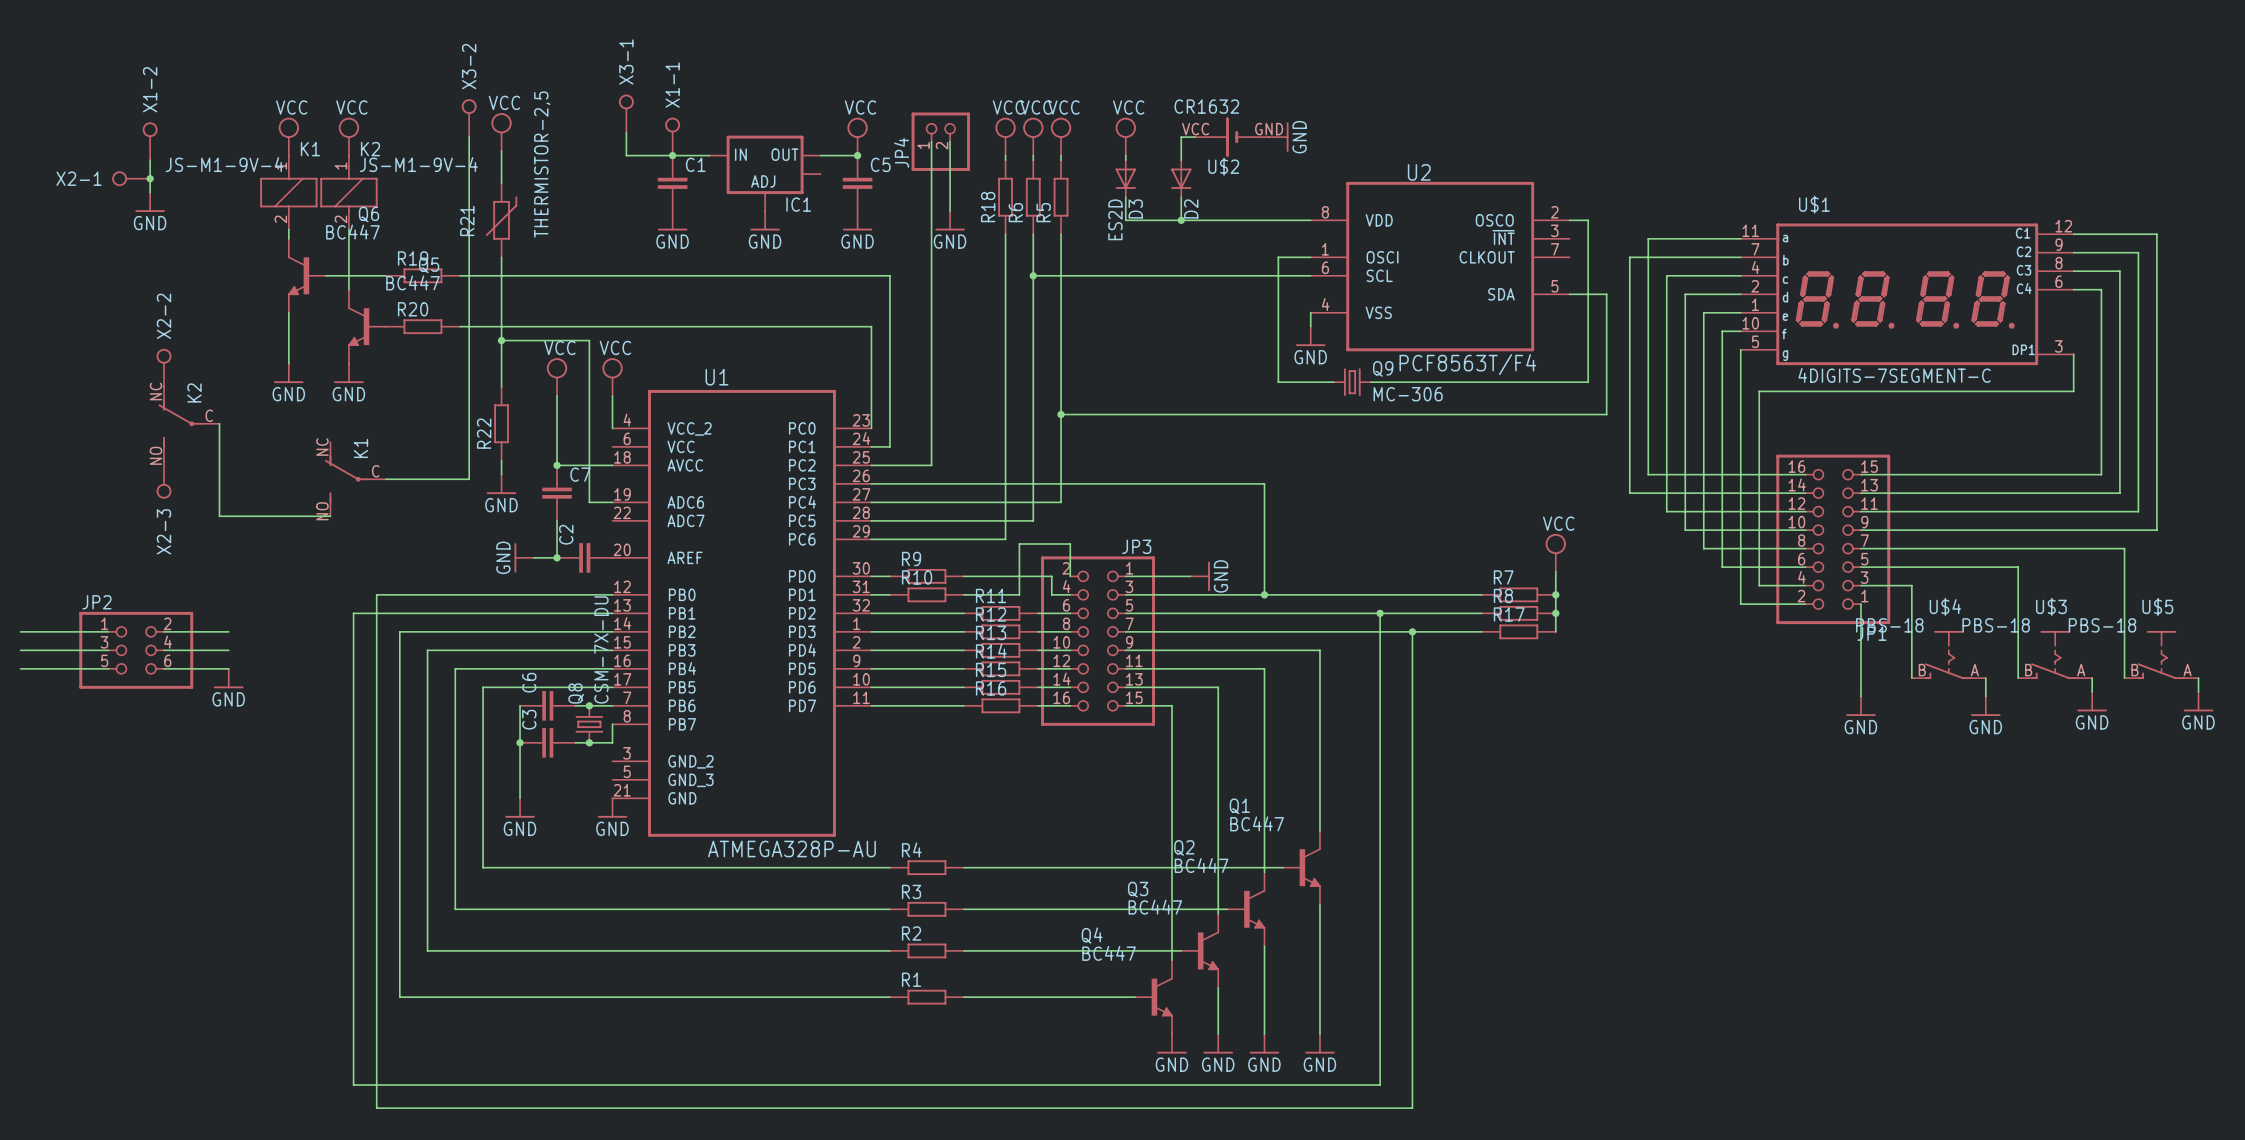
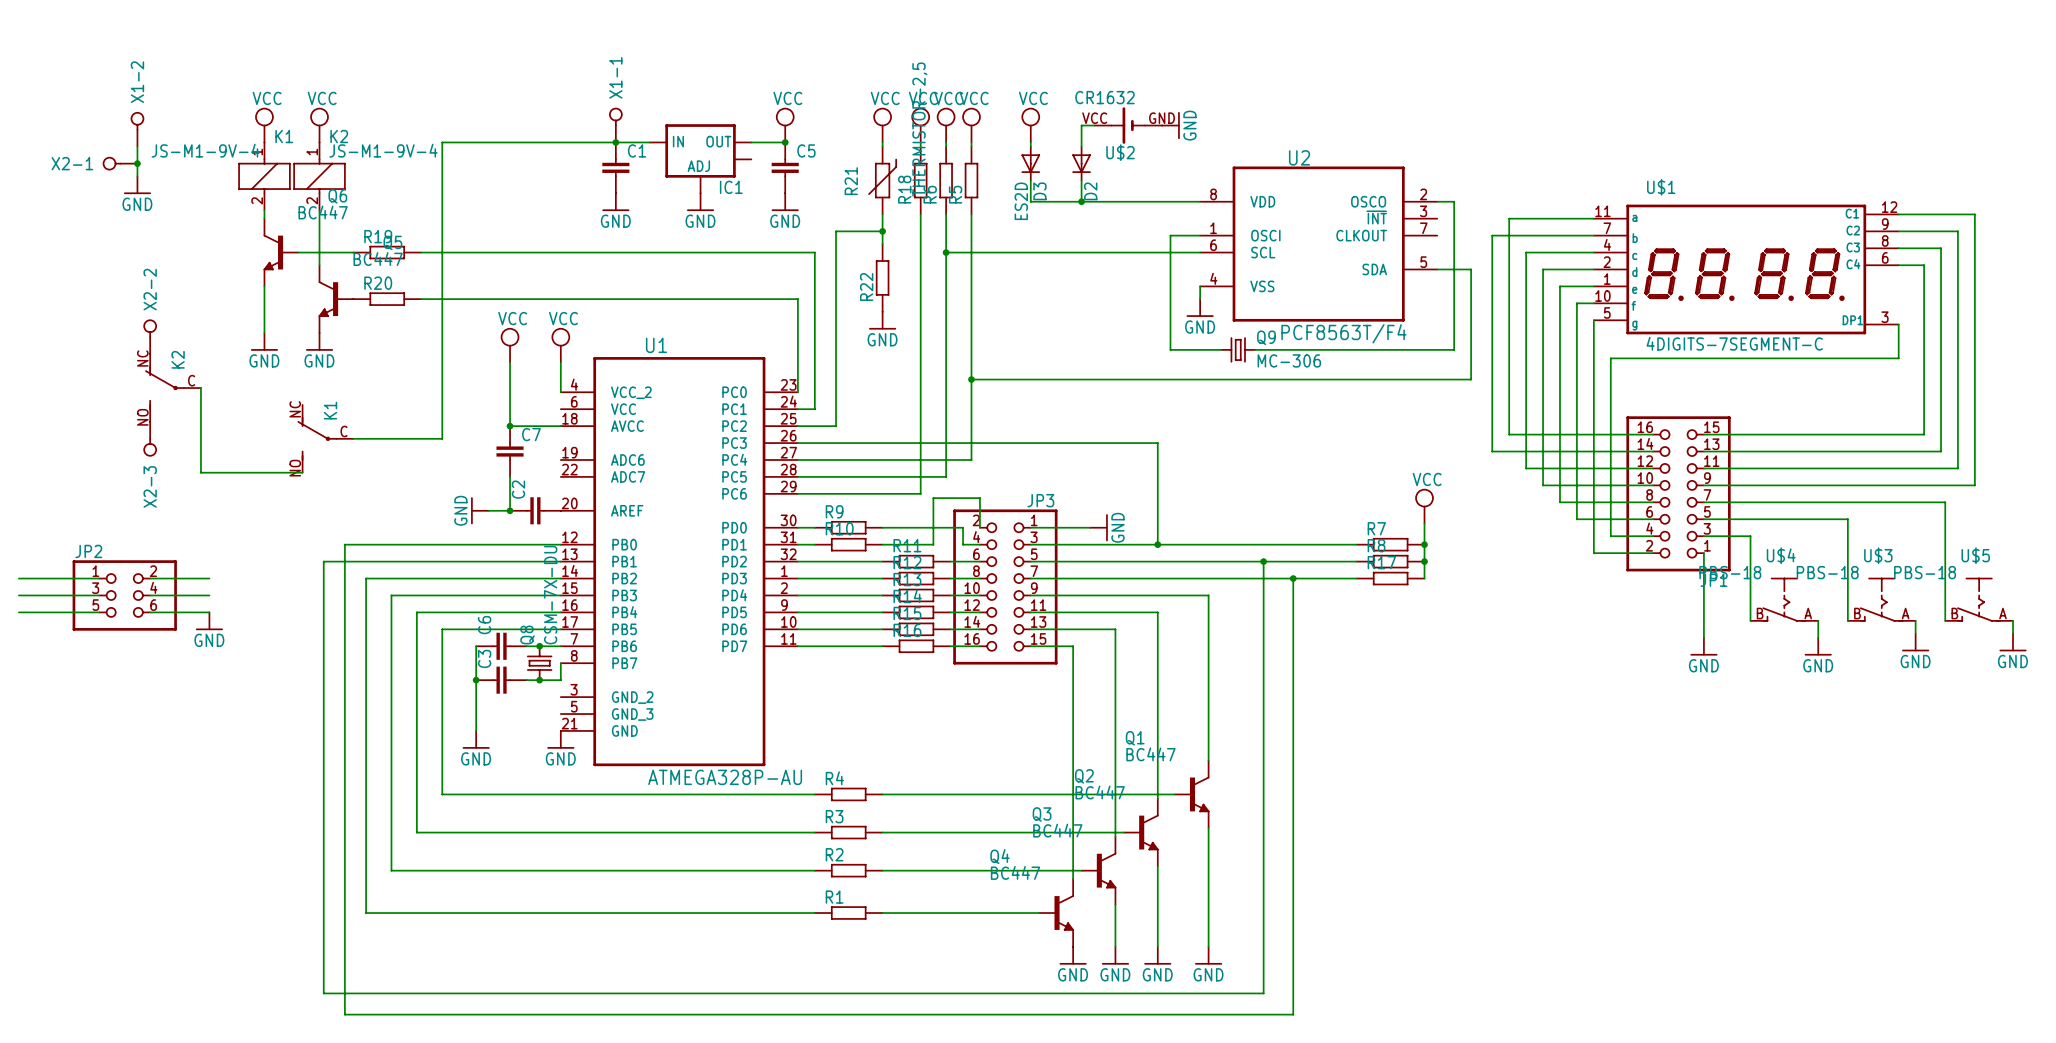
X3-1: (626, 113) -> none
X3-2: (469, 118) -> none
power symbol: VCC (501, 132) -> none
wire: (626, 132) (626, 155) -> none
power symbol: none -> VCC (882, 125)
wire: (469, 137) (469, 479) -> (573, 142) (442, 142) (442, 438) (429, 438)
wire: (931, 141) (931, 465) (913, 465) -> (882, 231) (836, 231) (836, 426)
JP4: (940, 141) -> none
wire: (950, 141) (950, 211) -> none
wire: (501, 150) (501, 183) -> none
wire: none -> (882, 142) (882, 146)
R21 position: (501, 220) -> (882, 180)
power symbol position: GND (950, 220) -> GND (882, 320)
wire: none -> (882, 214) (882, 244)
junction: none -> (882, 231)
wire: (501, 257) (501, 386) -> none
wire: (501, 340) (589, 340) (589, 502) (612, 502) -> none
junction: (501, 340) -> none
R22 position: (501, 423) -> (882, 277)
wire: (501, 460) (501, 474) -> none
power symbol: GND (501, 484) -> none

